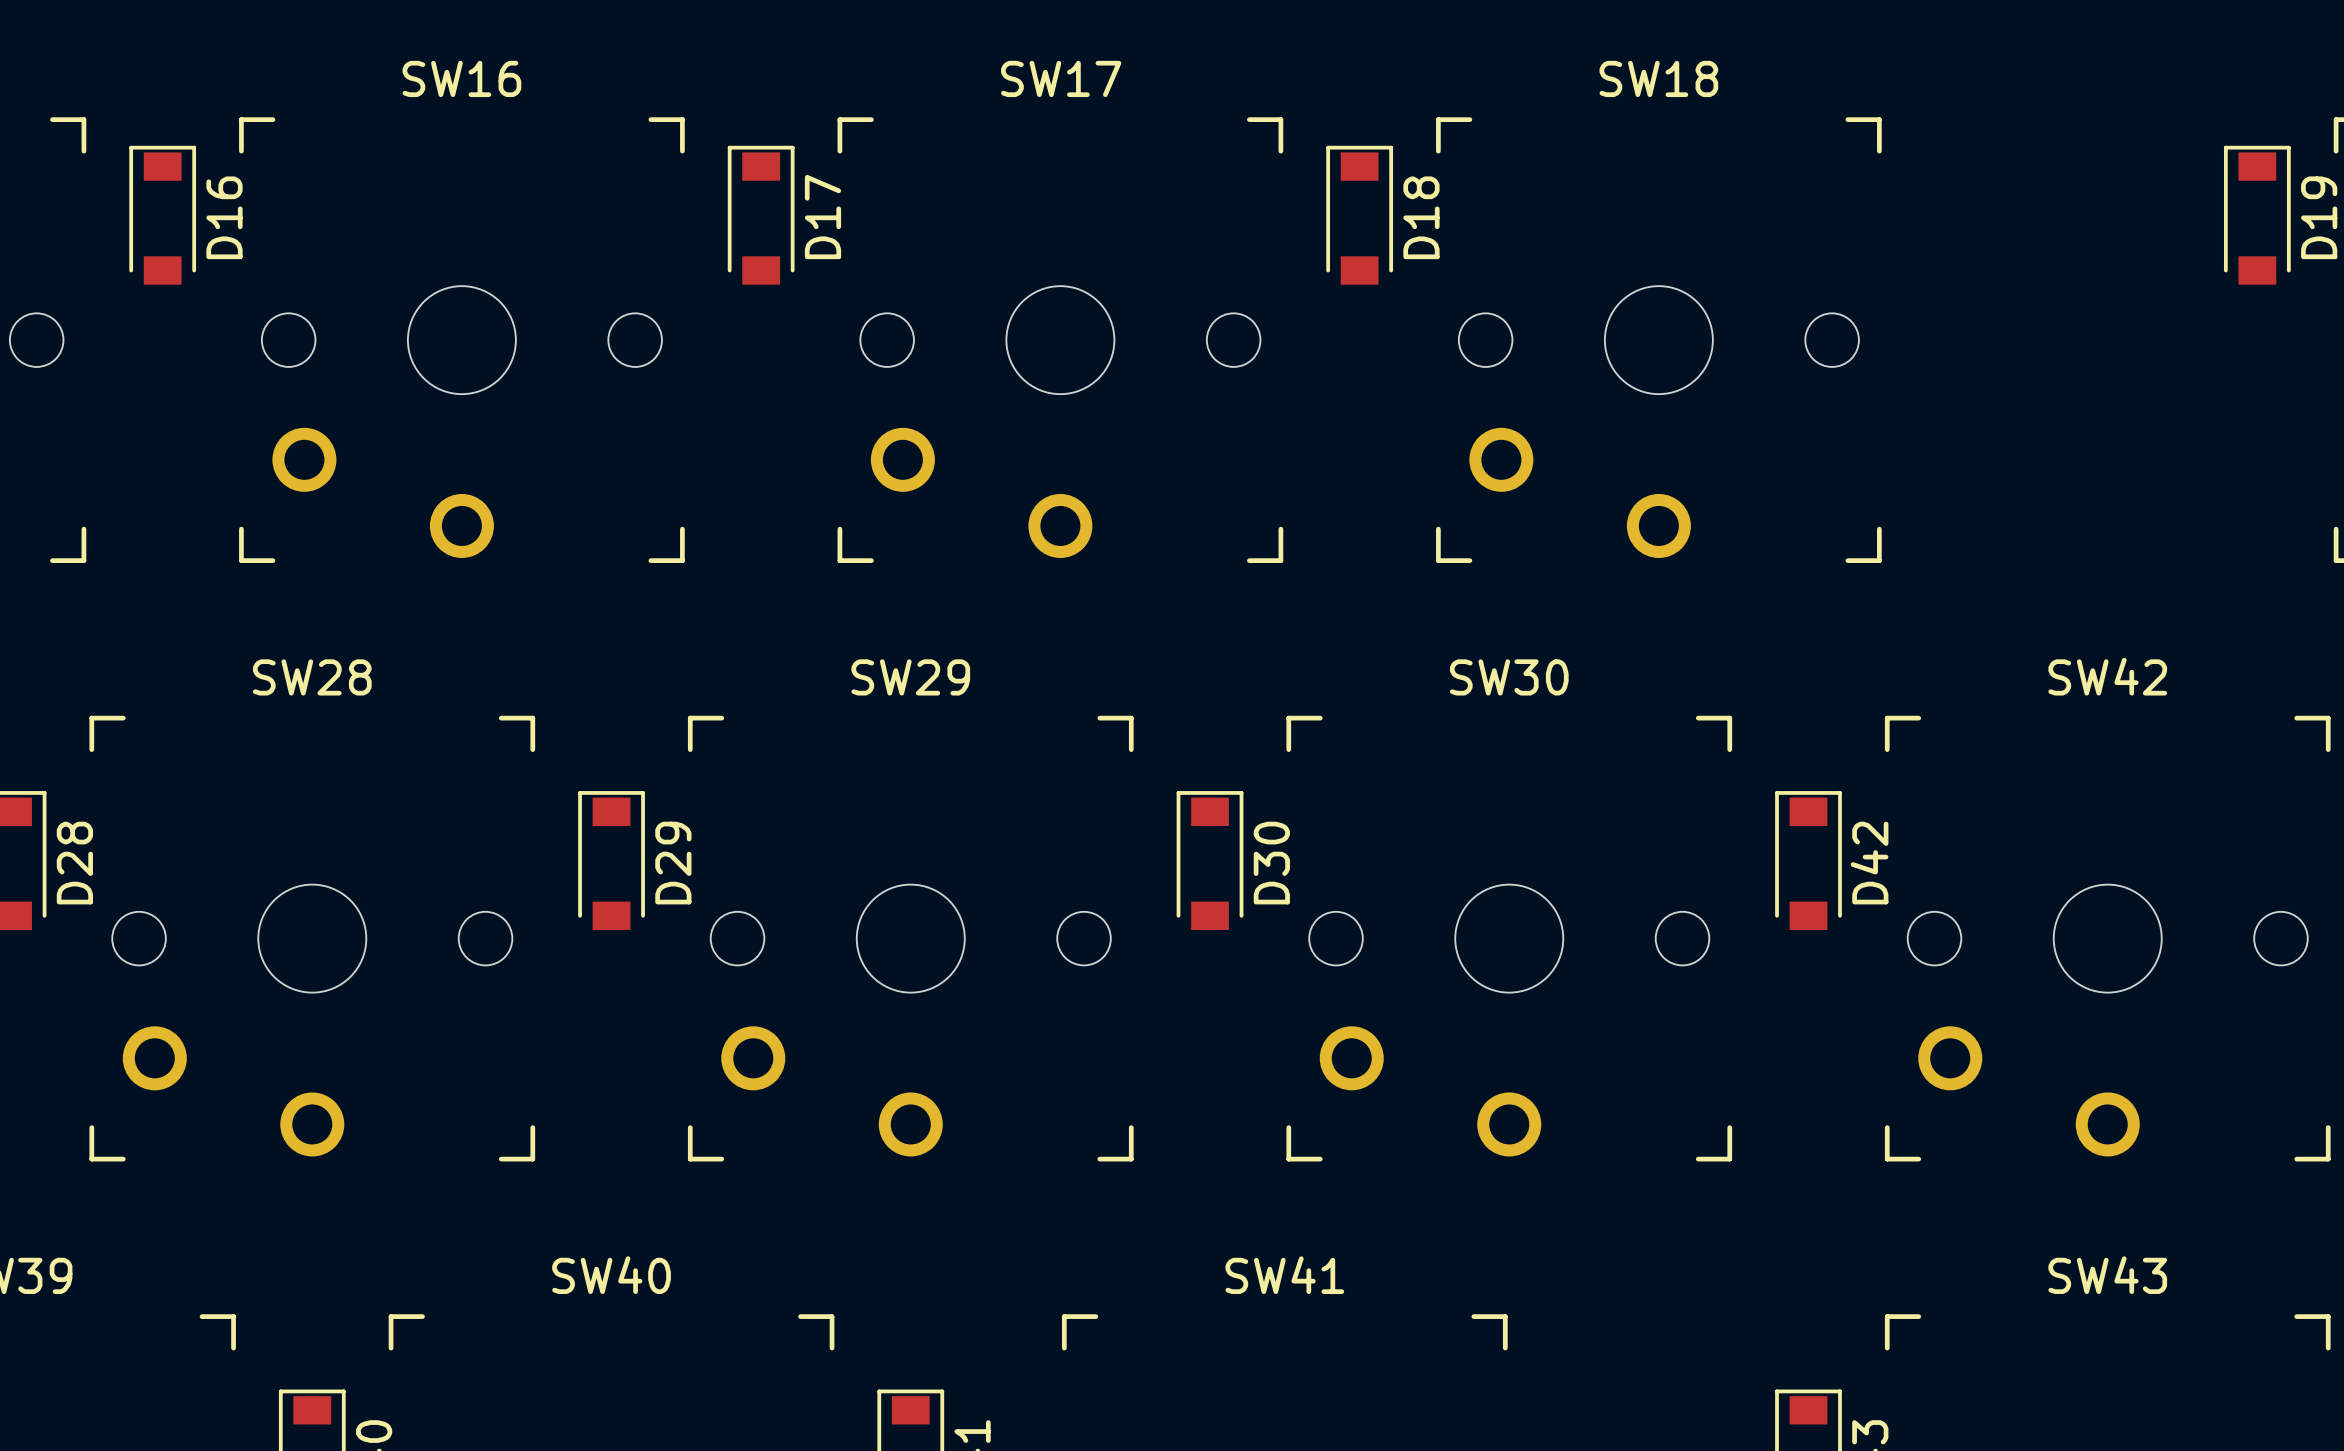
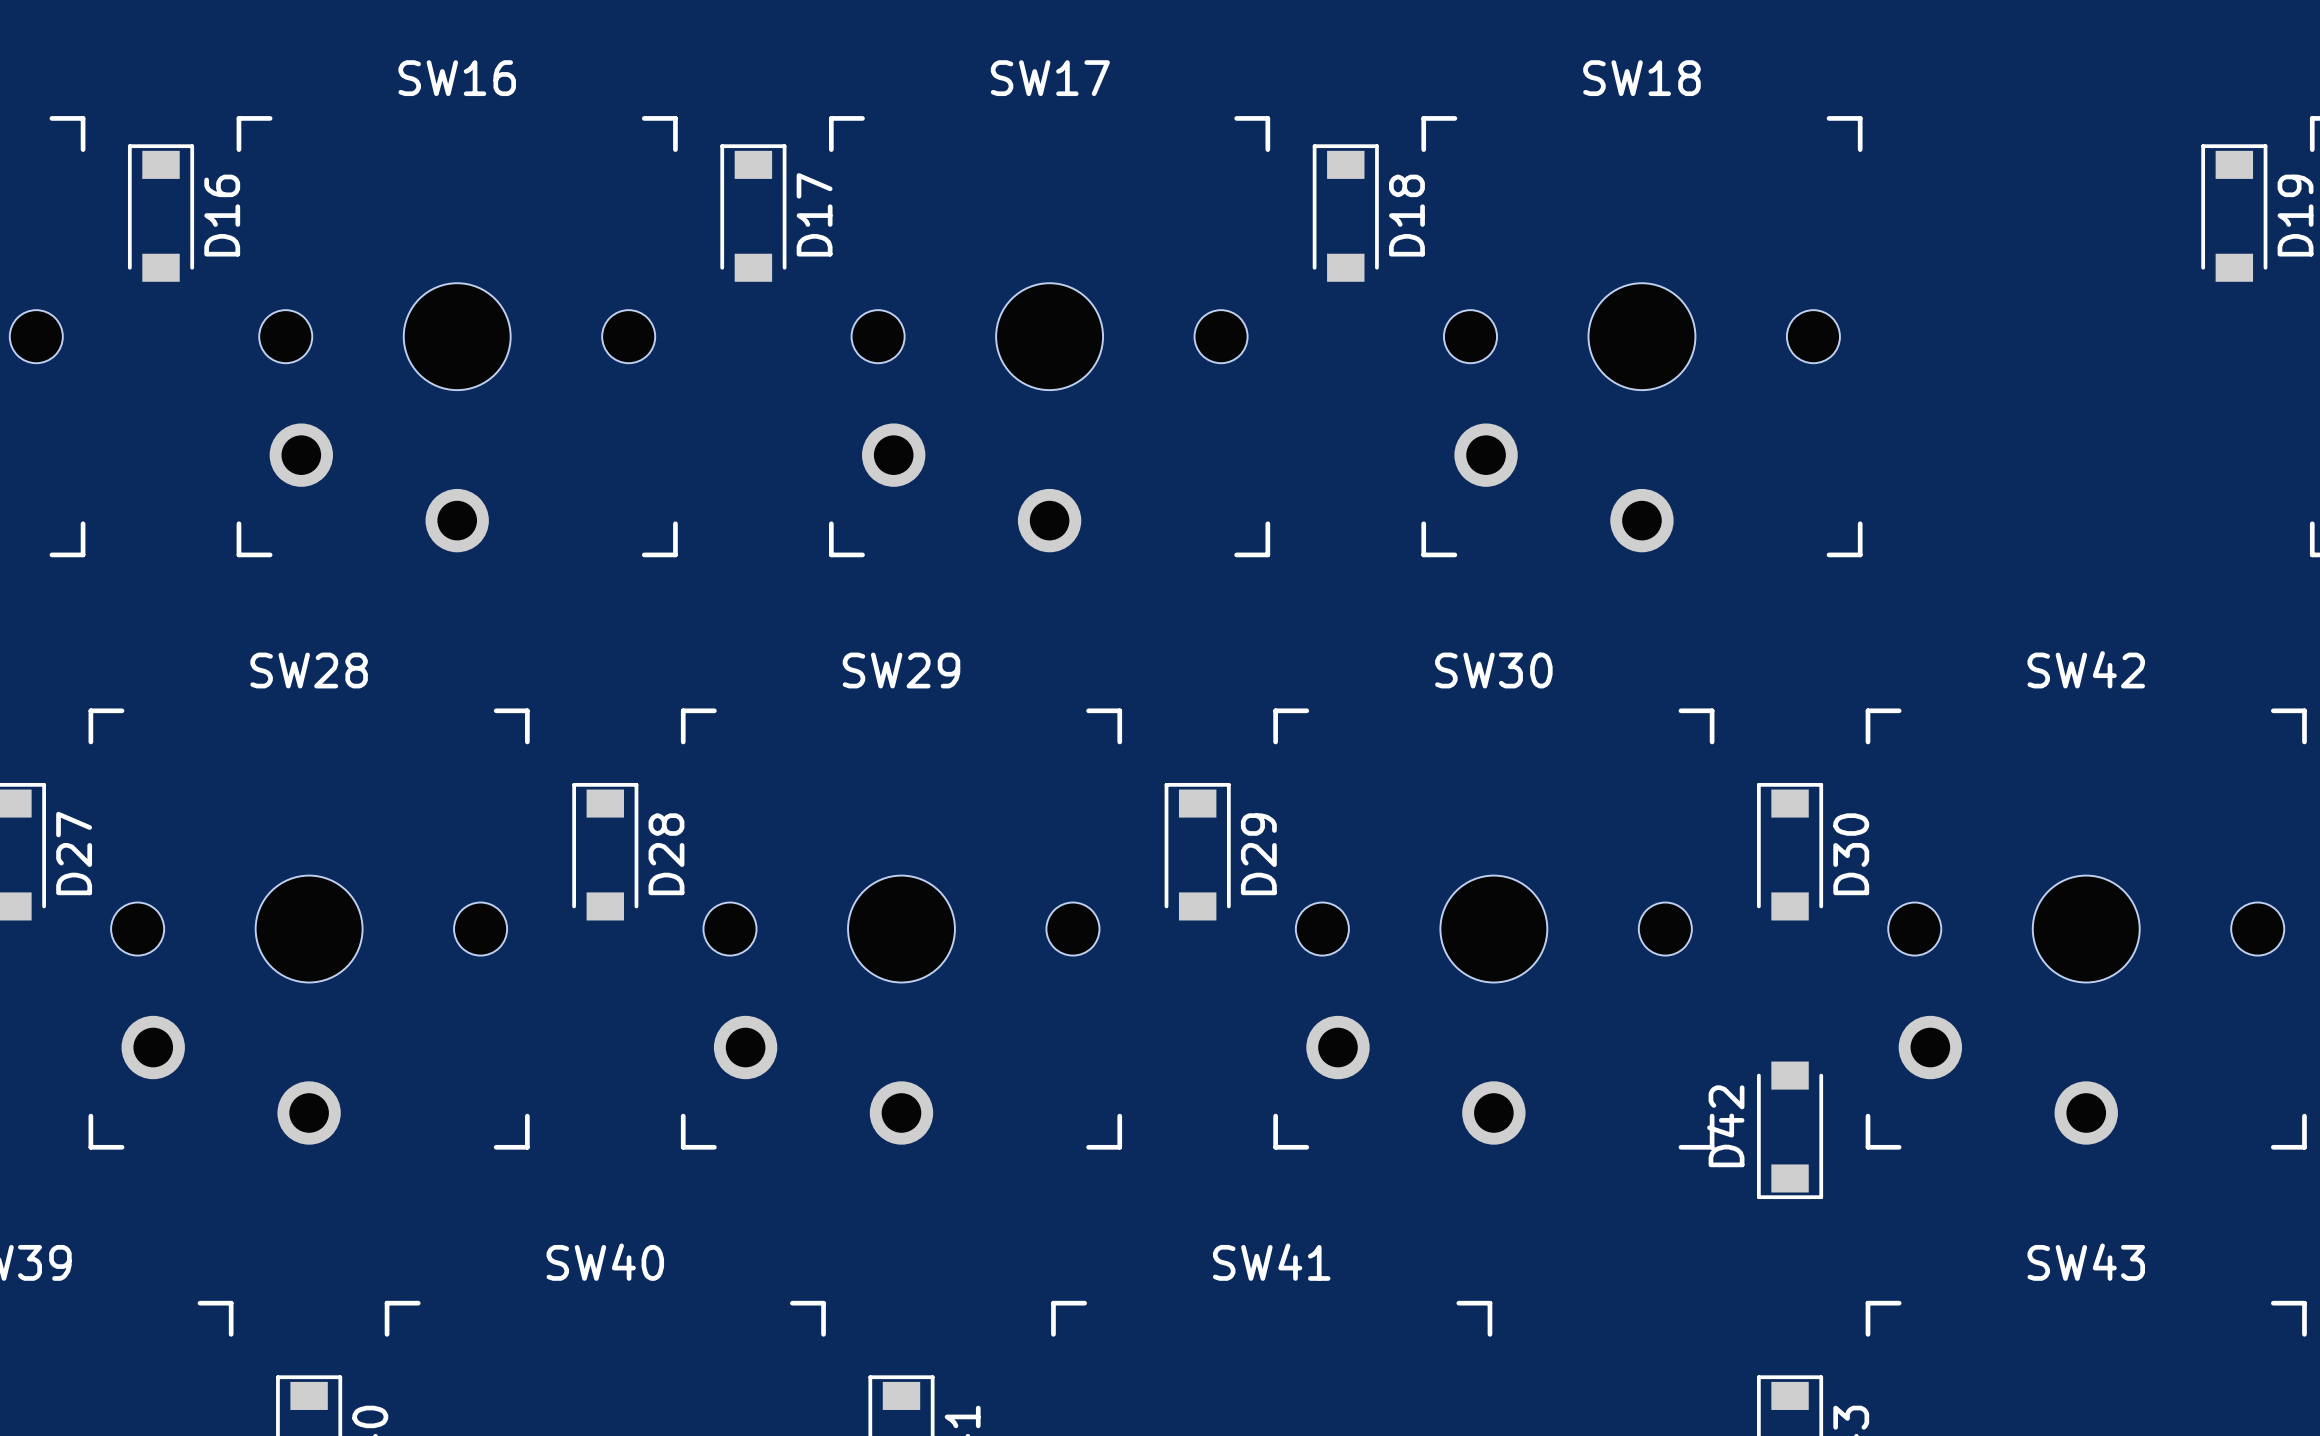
D28 name: D28 (74, 863) -> D27 (74, 853)
D29 name: D29 (673, 863) -> D28 (666, 854)
D30 name: D30 (1271, 863) -> D29 (1258, 854)
D42 name: D42 (1869, 863) -> D30 (1851, 854)
D42: none -> (1790, 1130)

